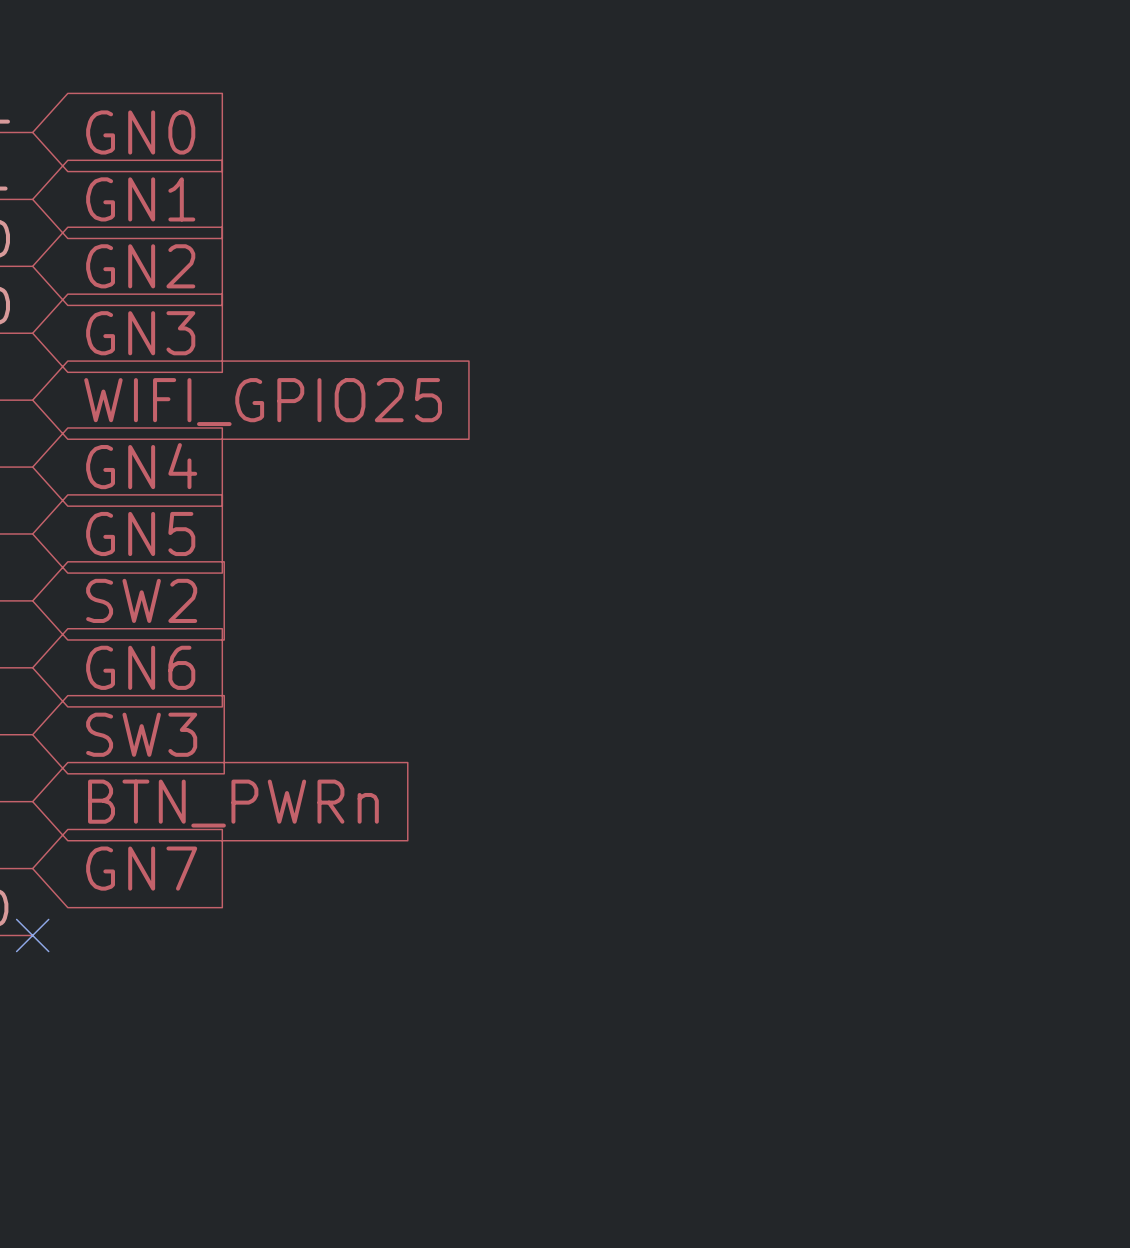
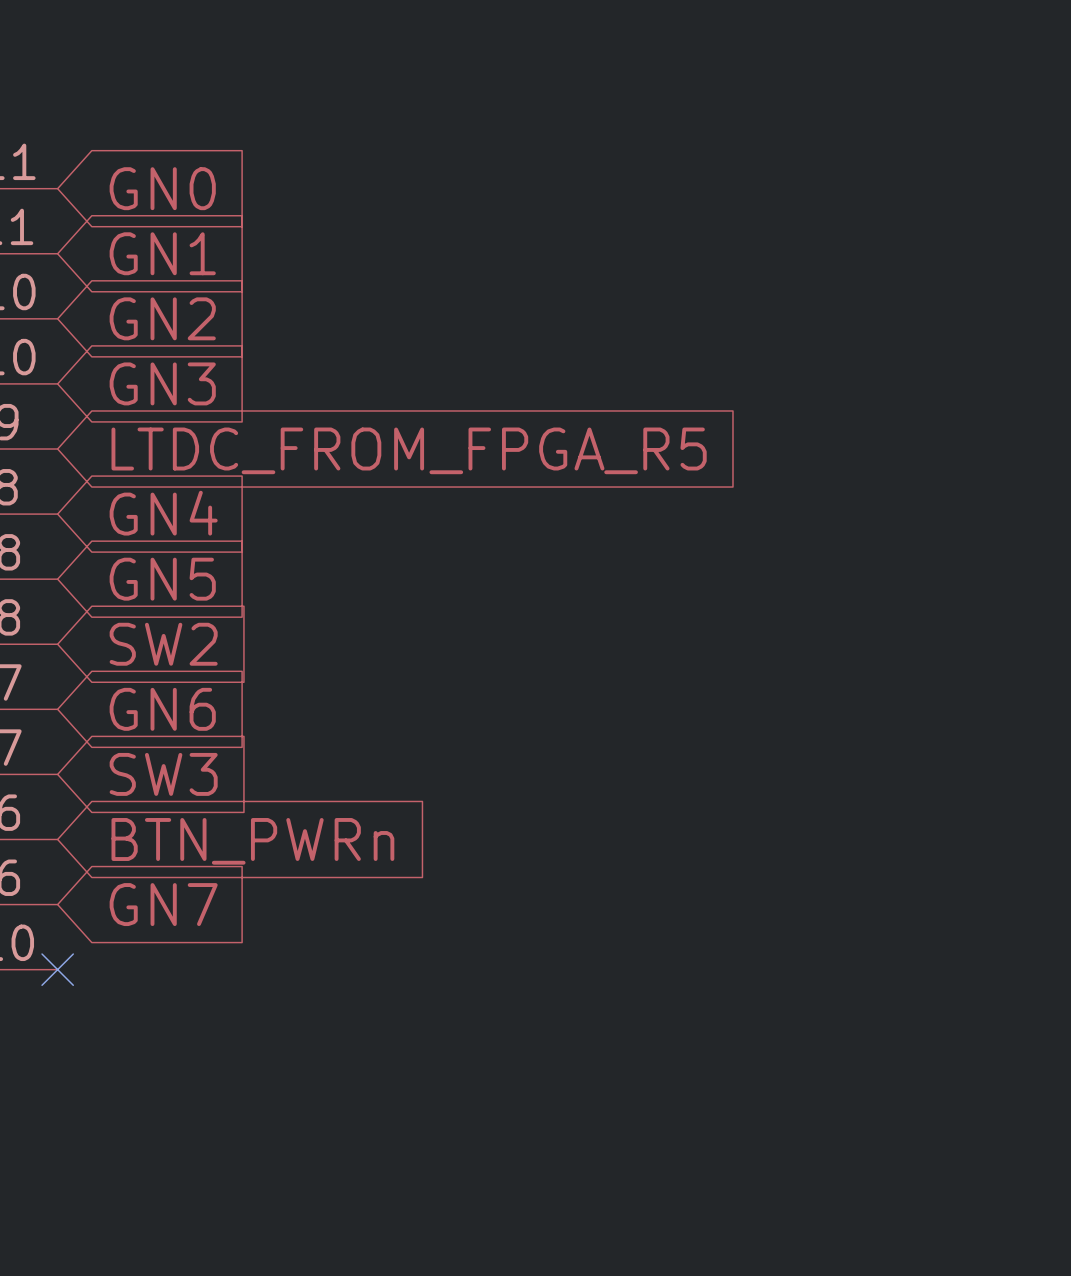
global label: WIFI_GPIO25 (263, 402) -> LTDC_FROM_FPGA_R5 (409, 450)

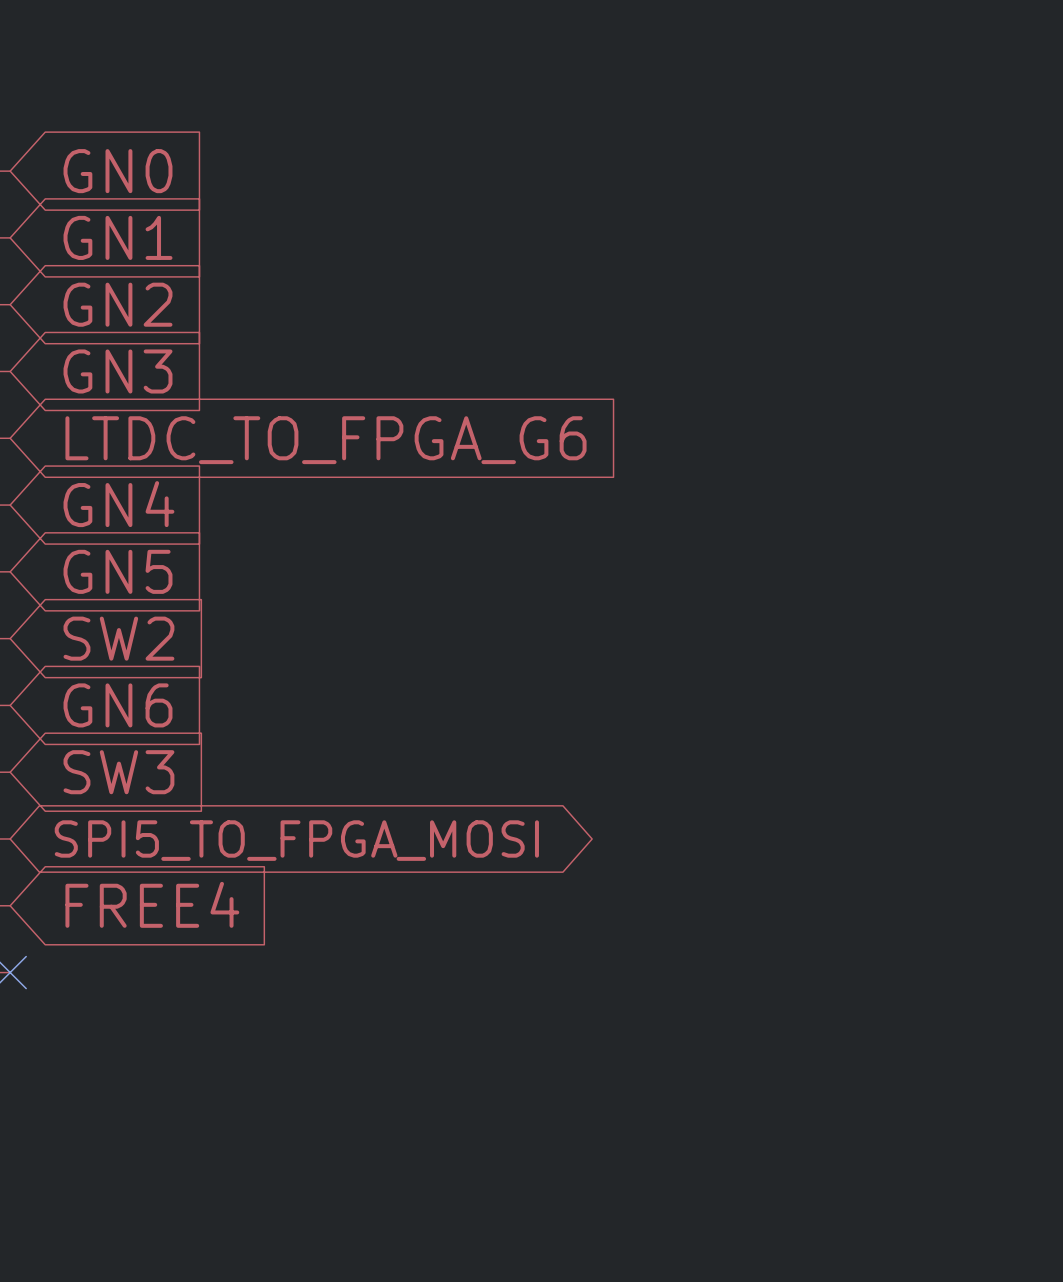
global label: LTDC_FROM_FPGA_R5 (409, 450) -> LTDC_TO_FPGA_G6 (325, 440)
global label shape: input (252, 841) -> bidirectional (296, 840)
global label: BTN_PWRn (252, 841) -> SPI5_TO_FPGA_MOSI (296, 840)
global label: GN7 (163, 904) -> FREE4 (152, 904)

